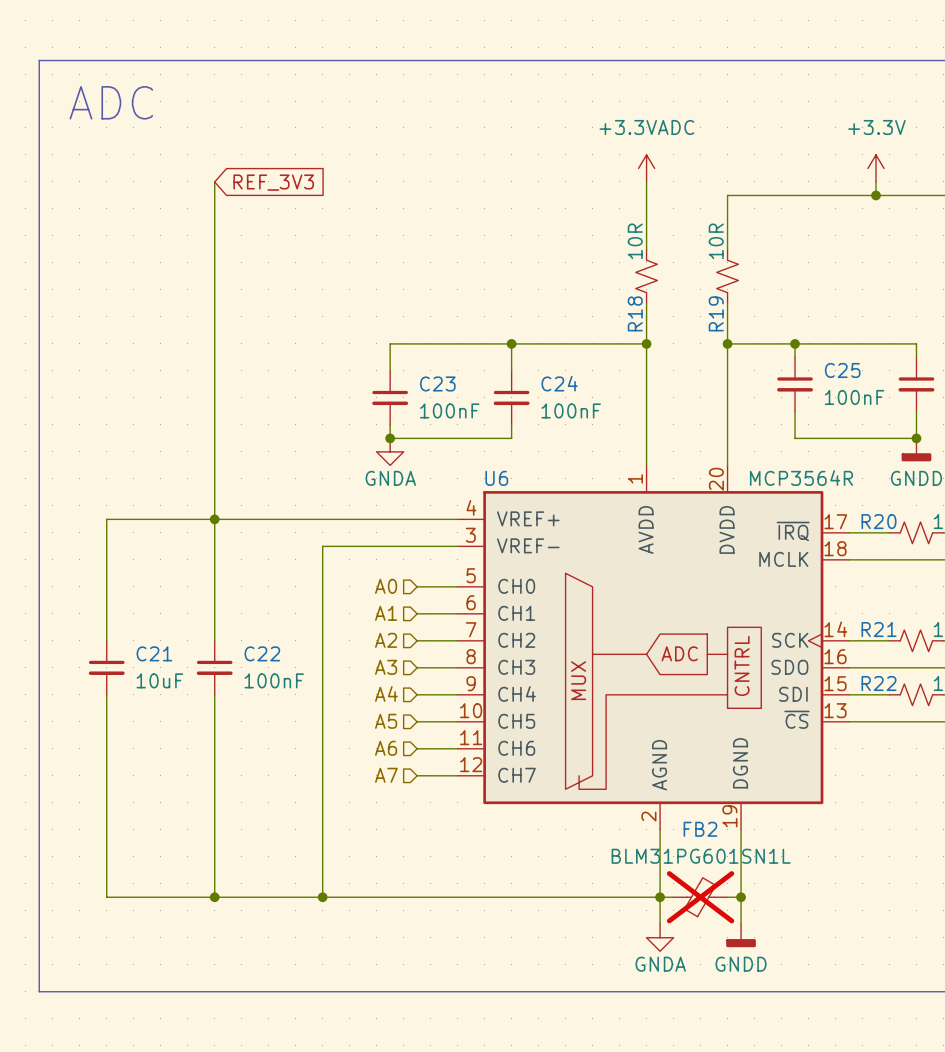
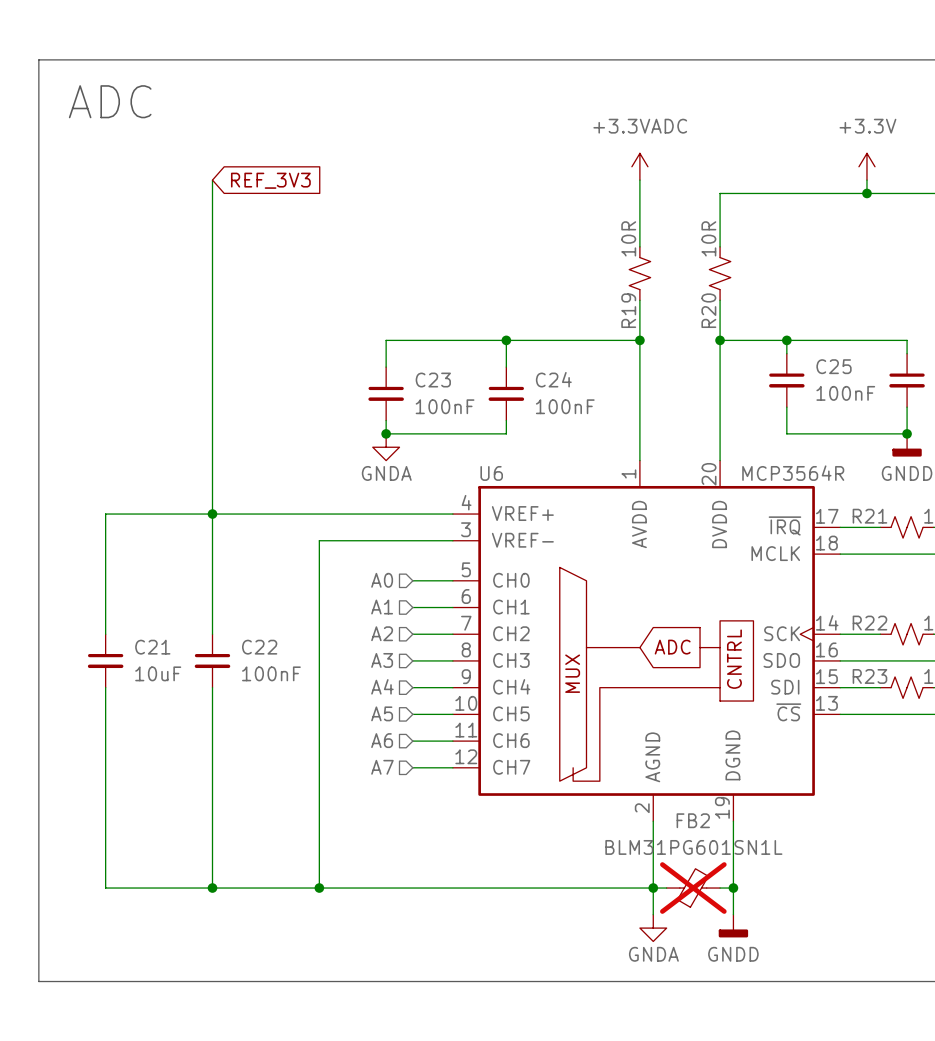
R18 name: R18 (635, 313) -> R19 (628, 310)
R19 name: R19 (716, 313) -> R20 (708, 310)
R20 name: R20 (879, 521) -> R21 (869, 516)
R21 name: R21 (879, 629) -> R22 (869, 623)
R22 name: R22 (879, 683) -> R23 (869, 676)

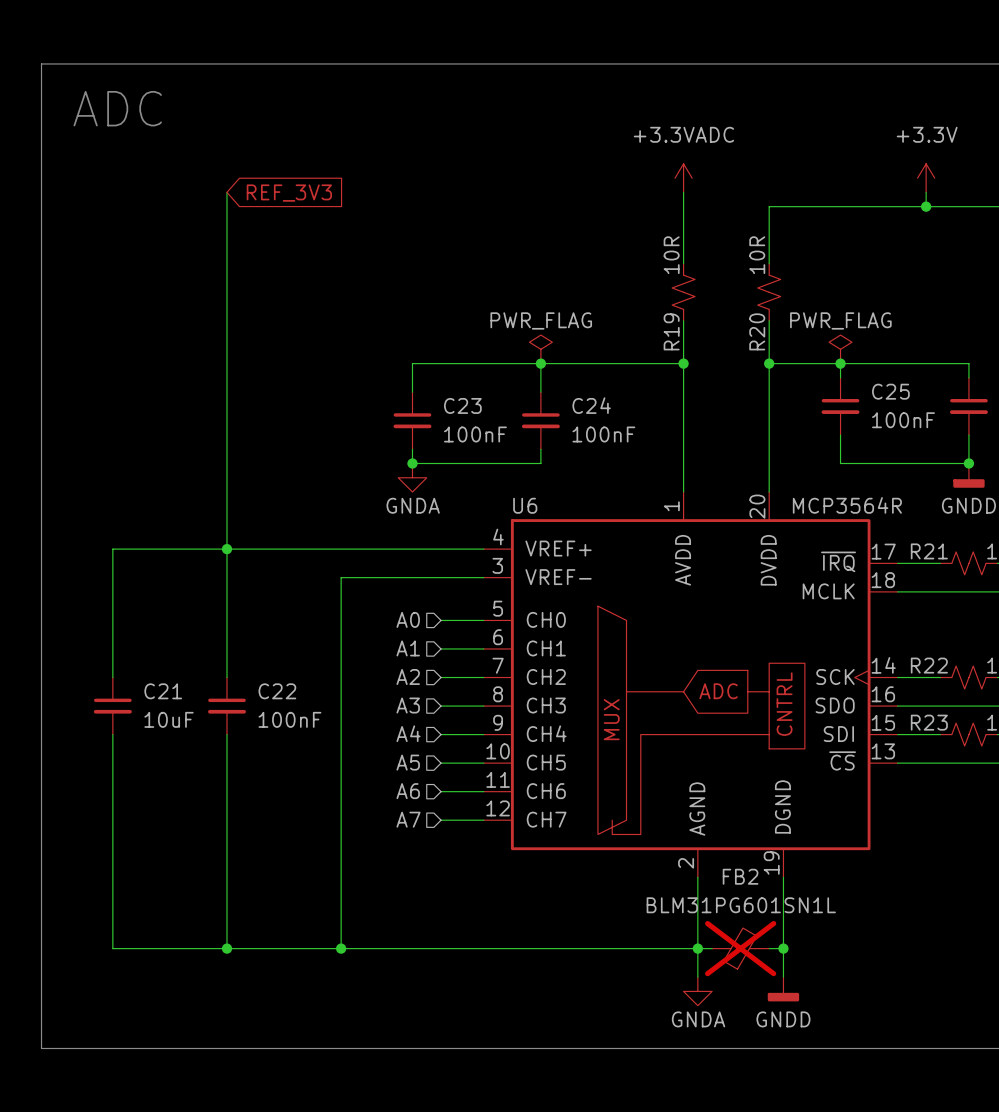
power symbol: none -> PWR_FLAG (540, 349)
power symbol: none -> PWR_FLAG (840, 349)

